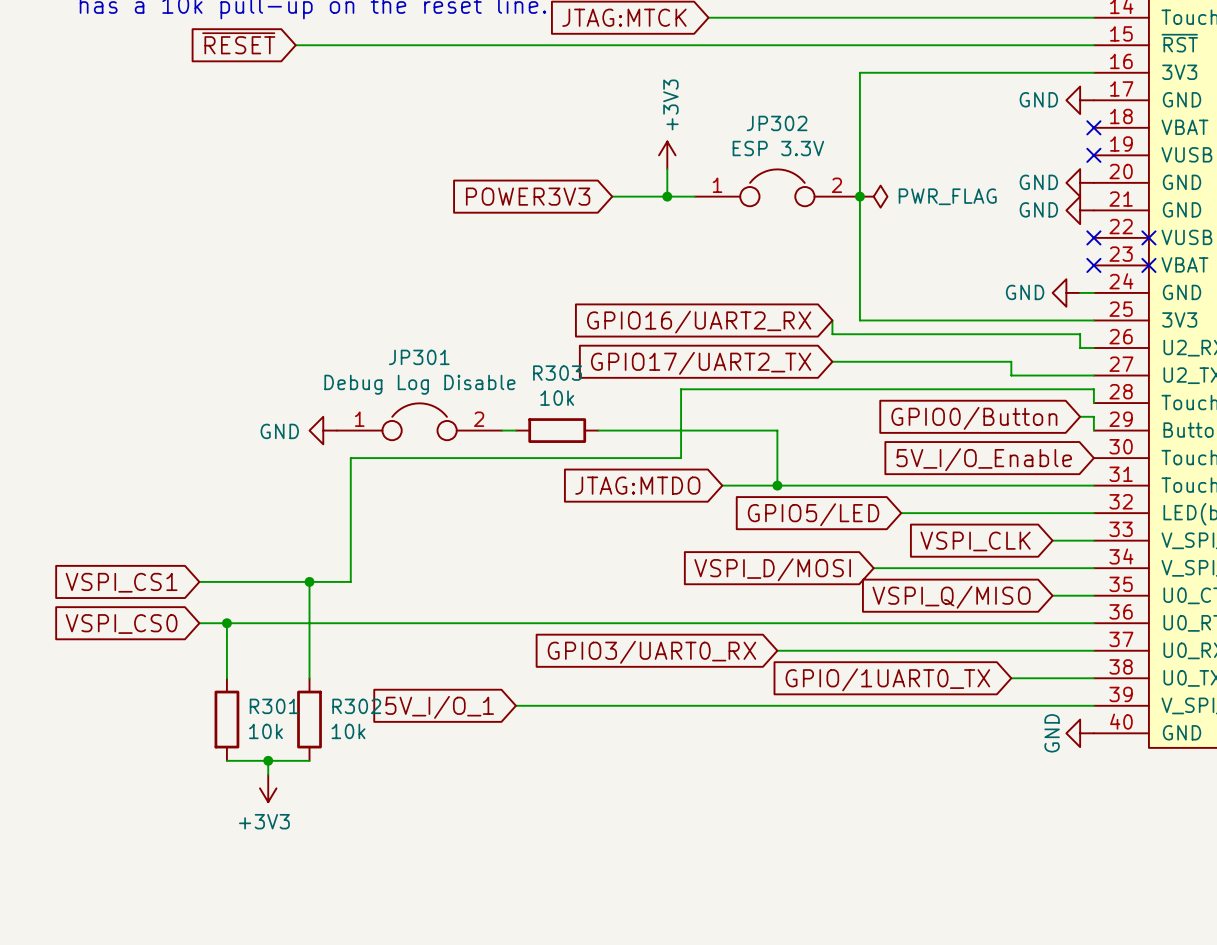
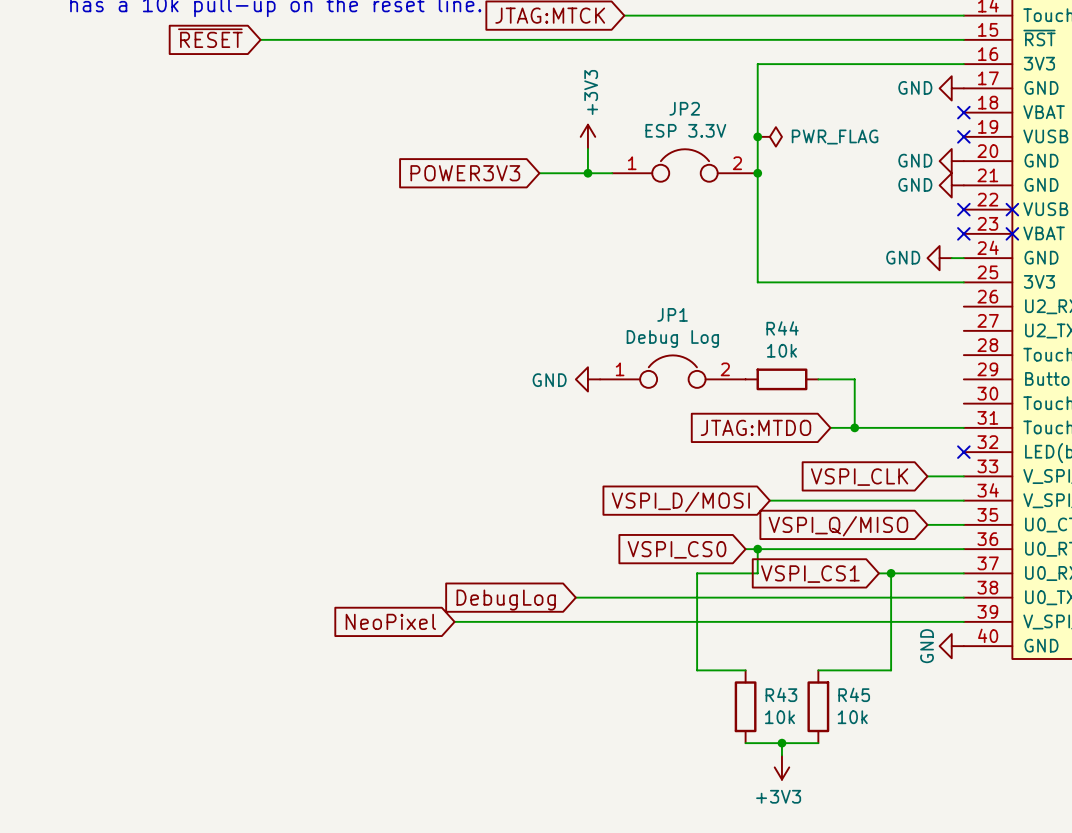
JP302 name: JP302 (777, 123) -> JP2 (684, 108)
junction: none -> (757, 136)
power symbol position: PWR_FLAG (873, 196) -> PWR_FLAG (769, 136)
wire: (832, 320) (832, 334) (1080, 334) (1080, 348) (1093, 348) -> none
global label: GPIO16/UART2_RX (699, 322) -> none
wire: (832, 361) (1011, 361) (1011, 375) (1093, 375) -> none
global label: GPIO17/UART2_TX (701, 363) -> none
wire: (1093, 403) (1093, 389) (681, 389) (681, 458) (350, 458) (350, 581) (199, 581) -> none
wire: (1080, 416) (1093, 416) (1093, 430) -> none
global label: GPIO0/Button (974, 418) -> none
JP301: Debug Log Disable (419, 421) -> none
JP1: none -> Debug Log (672, 371)
power symbol: GND (323, 430) -> none
wire: (502, 430) (515, 430) -> none
R303: 10k (557, 430) -> none
wire: (598, 430) (777, 430) (777, 485) -> none
power symbol: none -> GND (587, 379)
R44: none -> 10k (781, 379)
wire: none -> (818, 379) (854, 379) (854, 427)
global label: 5V_I/O_Enable (984, 459) -> none
global label position: JTAG:MTDO (637, 485) -> JTAG:MTDO (755, 427)
wire: (722, 485) (942, 485) -> none
junction: (777, 485) -> none
junction: none -> (854, 427)
wire: (901, 513) (1093, 513) -> none
no-connect mark: none -> (963, 452)
global label: GPIO5/LED (813, 514) -> none
wire: (309, 581) (309, 678) -> none
junction: (309, 581) -> none
global label: VSPI_CS1 (121, 582) -> none
wire: (199, 623) (846, 623) -> none
wire: (226, 623) (226, 678) -> none
junction: (226, 623) -> none
junction: none -> (757, 549)
global label: VSPI_CS0 (121, 624) -> none
global label: none -> VSPI_CS0 (677, 549)
wire: (777, 650) (791, 650) -> (745, 670) (697, 670) (697, 573)
wire: (859, 650) (997, 650) -> (757, 573) (757, 549)
wire: none -> (891, 573) (891, 670) (818, 670)
junction: none -> (891, 573)
global label: none -> VSPI_CS1 (810, 574)
global label: GPIO3/UART0_RX (651, 652) -> none
wire: none -> (575, 597) (891, 597)
global label: GPIO/1UART0_TX (887, 679) -> none
global label: none -> DebugLog (506, 600)
global label: 5V_I/O_1 (439, 707) -> NeoPixel (390, 621)
R301: 10k (226, 719) -> none
R302: 10k (309, 719) -> none
wire: (226, 760) (309, 760) -> none
wire: (268, 760) (268, 774) -> none
junction: (268, 760) -> none
power symbol: +3V3 (268, 788) -> none
R43: none -> 10k (745, 706)
R45: none -> 10k (818, 706)
wire: none -> (745, 743) (818, 743)
wire: none -> (781, 743) (781, 755)
junction: none -> (781, 743)
power symbol: none -> +3V3 (781, 767)

